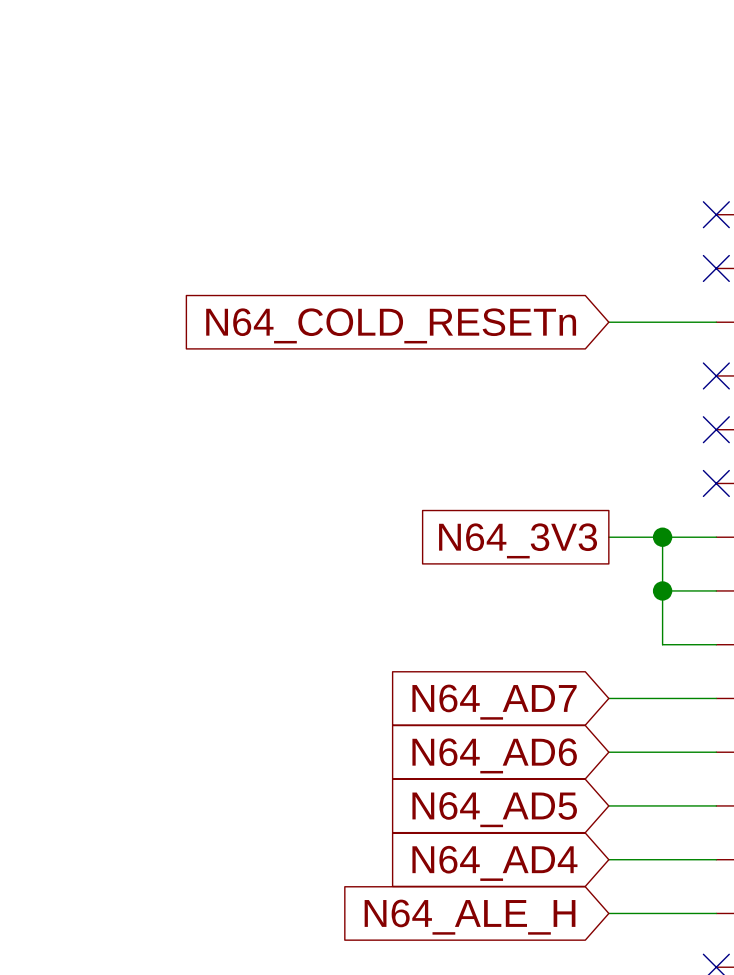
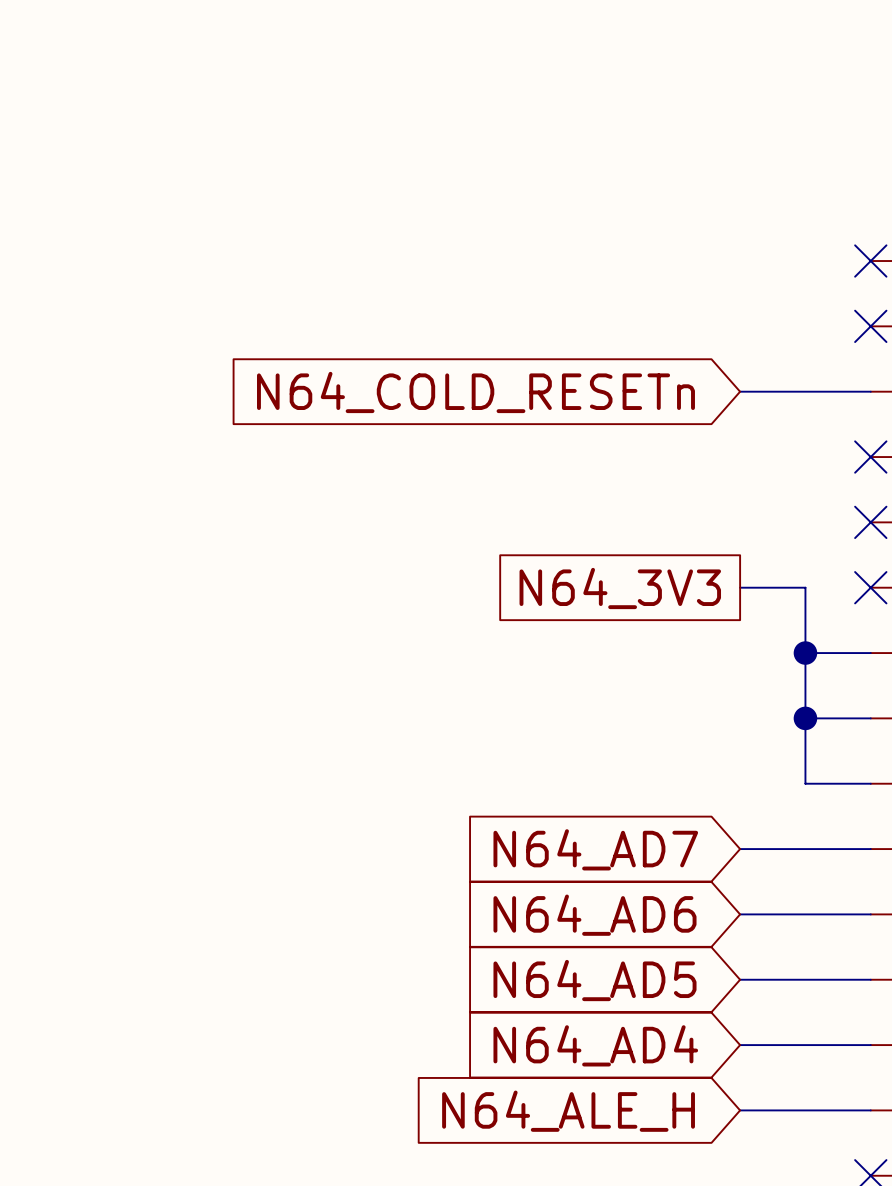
wire: (608, 537) (662, 537) -> (740, 587) (805, 587) (805, 653)
global label position: N64_3V3 (518, 540) -> N64_3V3 (620, 588)

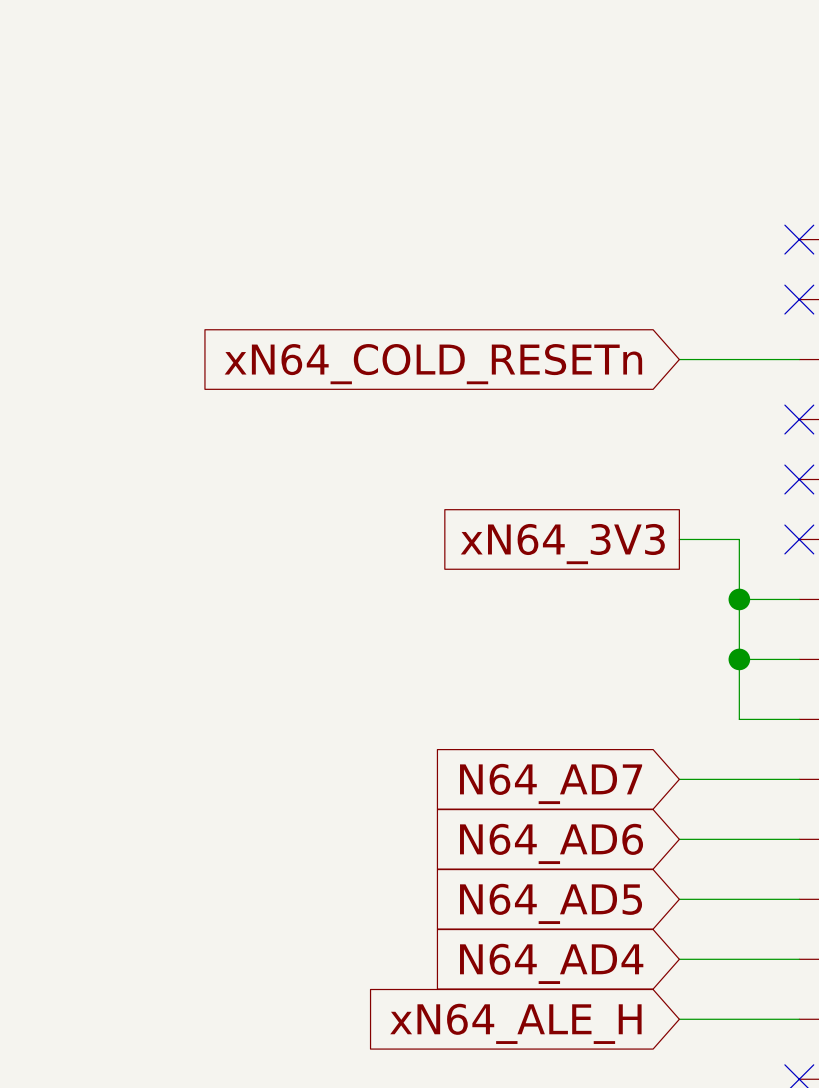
global label: N64_COLD_RESETn (475, 392) -> xN64_COLD_RESETn (433, 364)
global label: N64_3V3 (620, 588) -> xN64_3V3 (562, 544)
global label: N64_ALE_H (568, 1111) -> xN64_ALE_H (515, 1023)

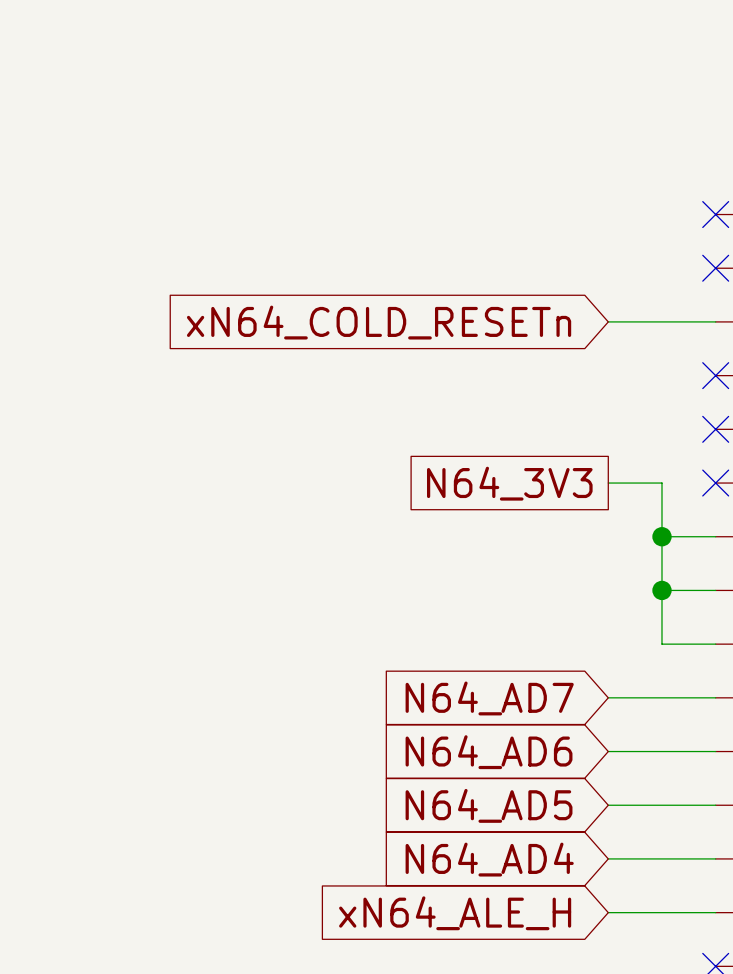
global label: xN64_3V3 (562, 544) -> N64_3V3 (509, 483)

